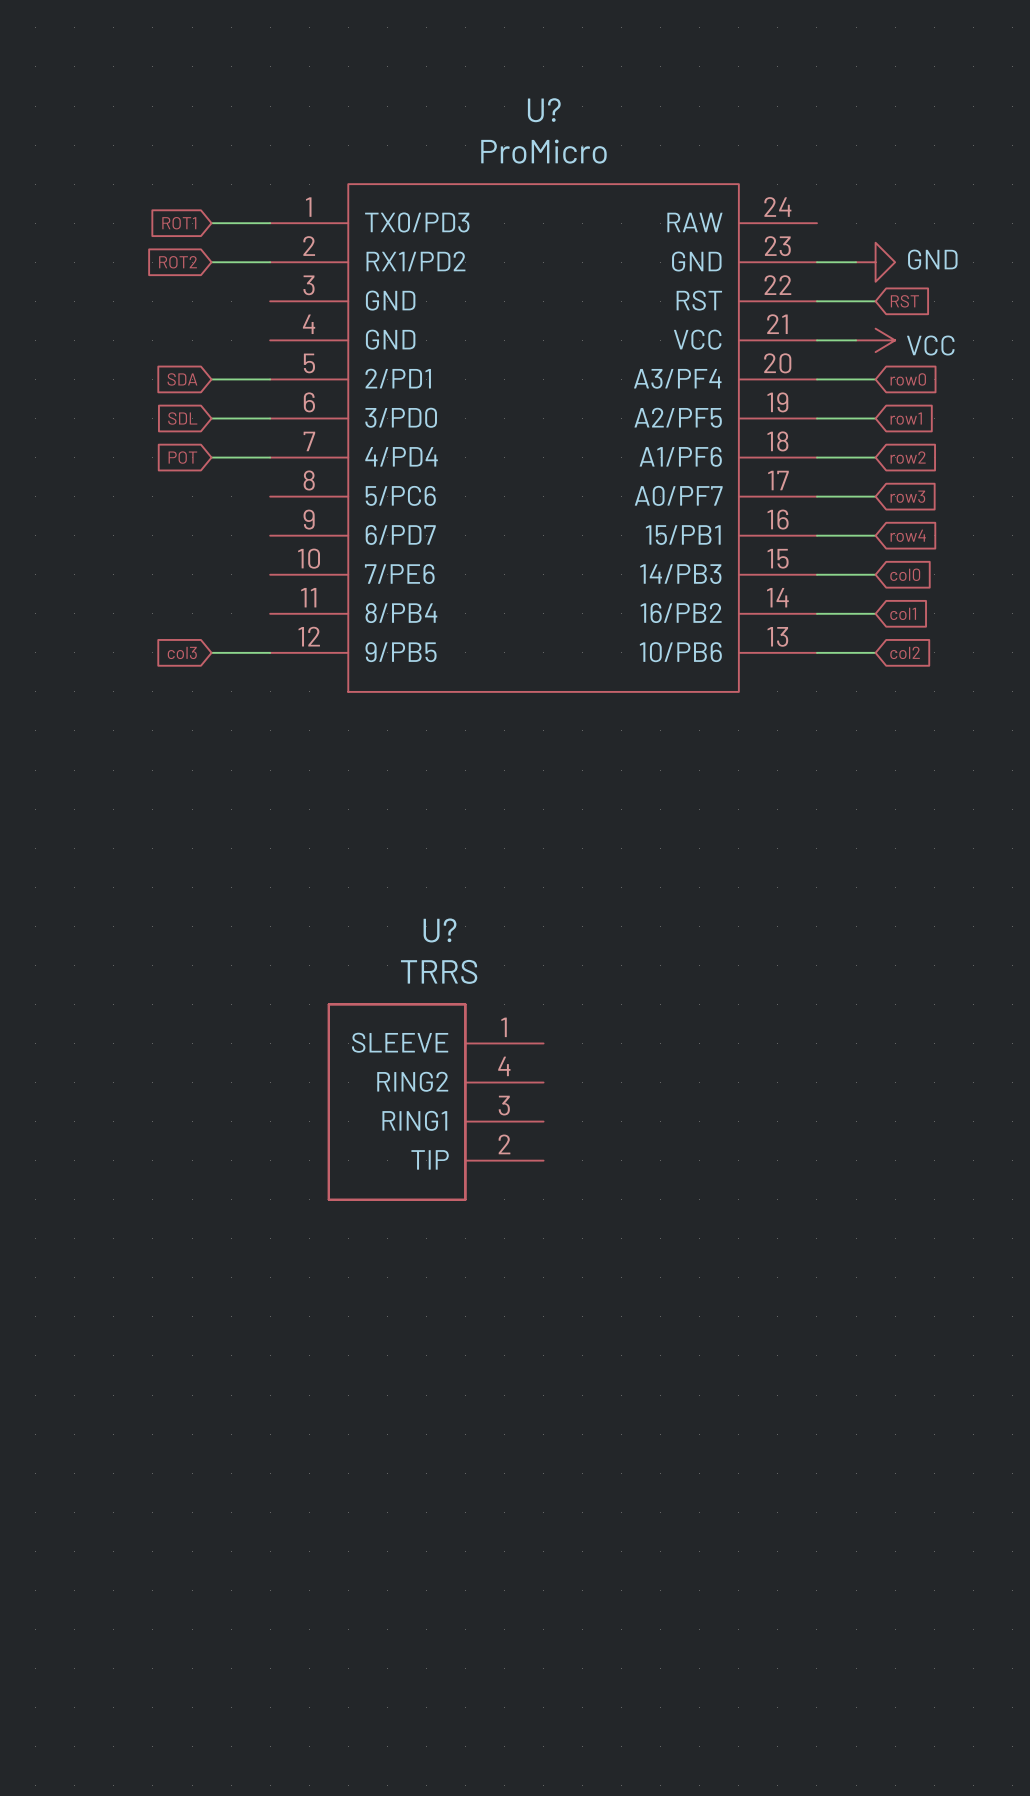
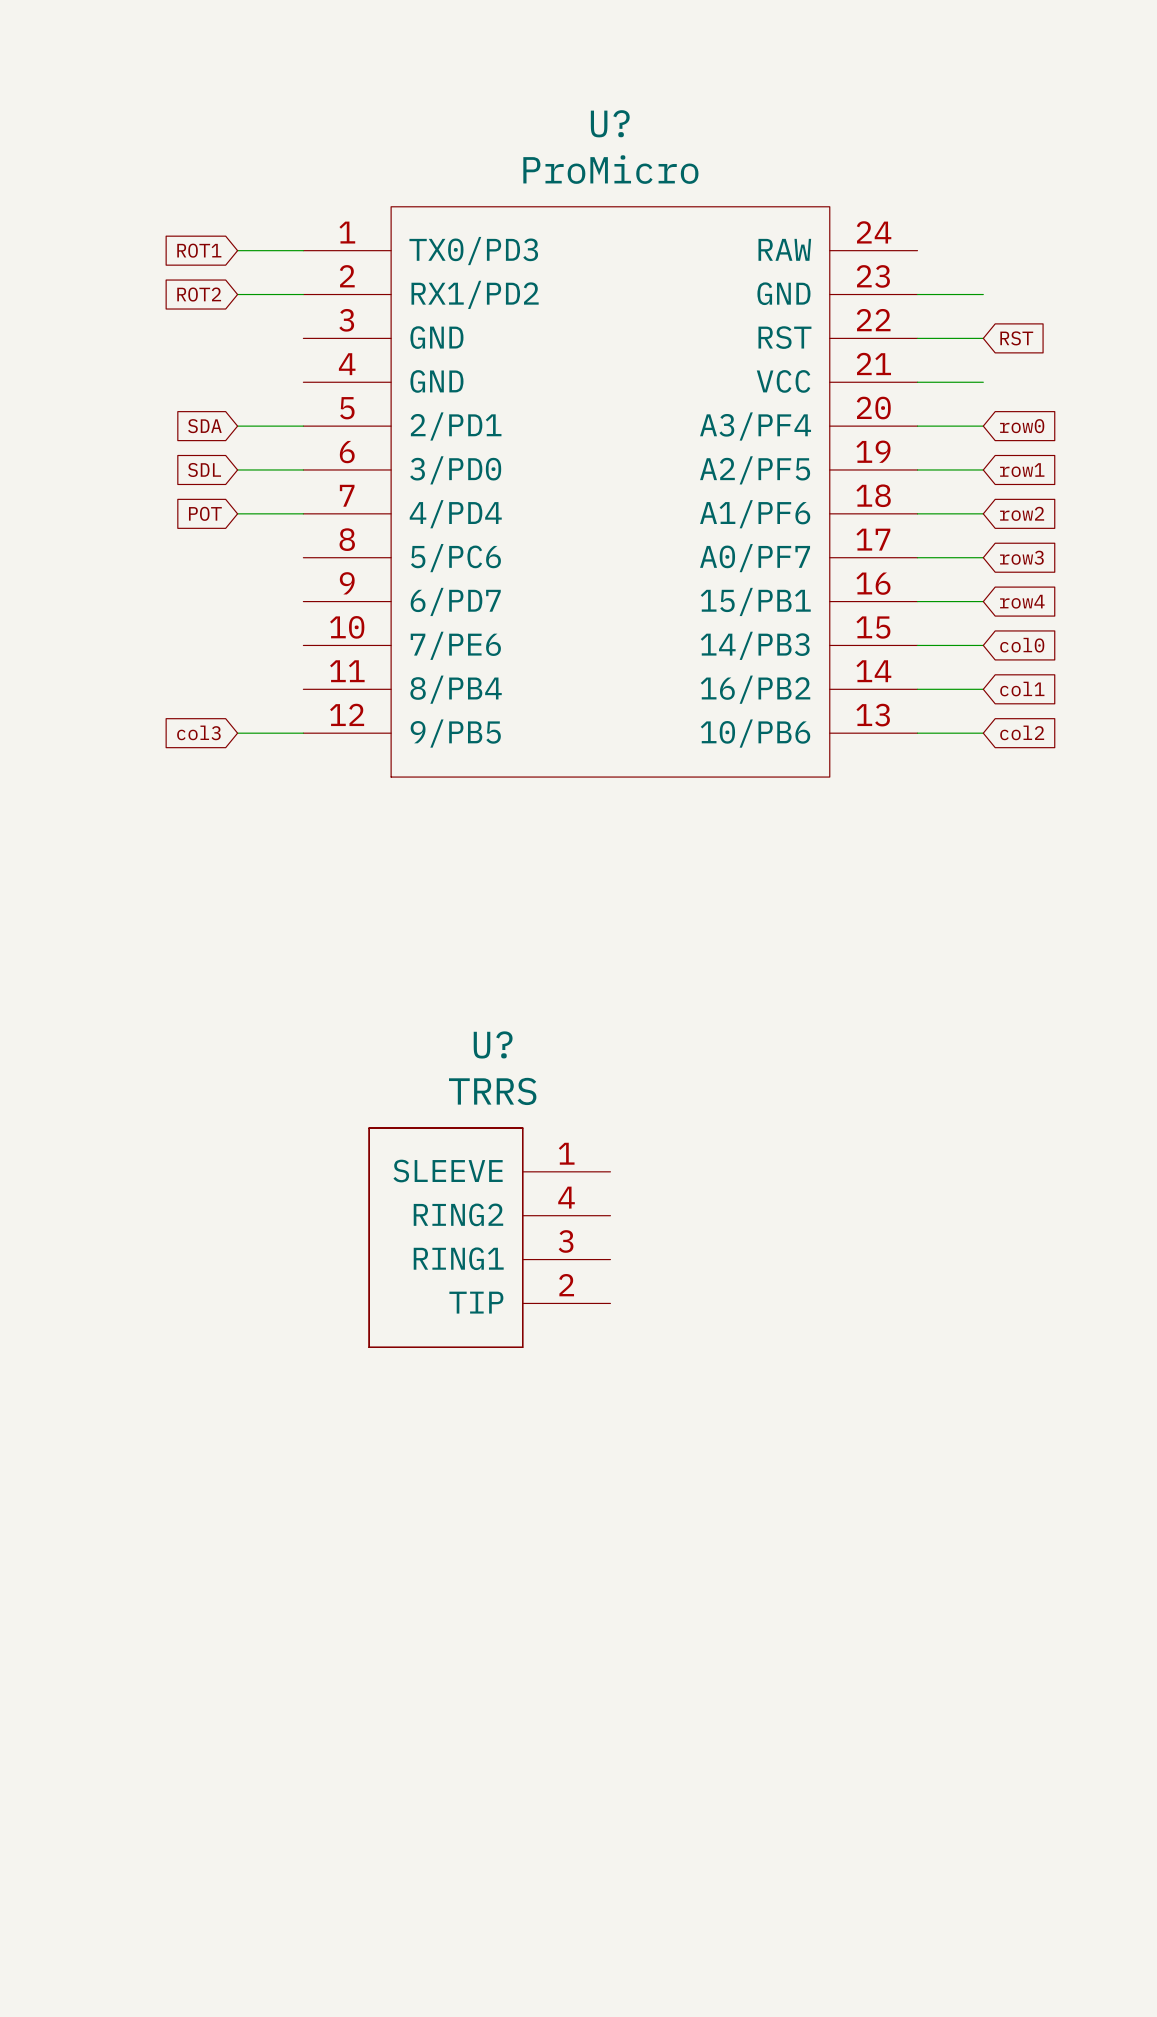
power symbol: GND (875, 262) -> none
power symbol: VCC (875, 340) -> none

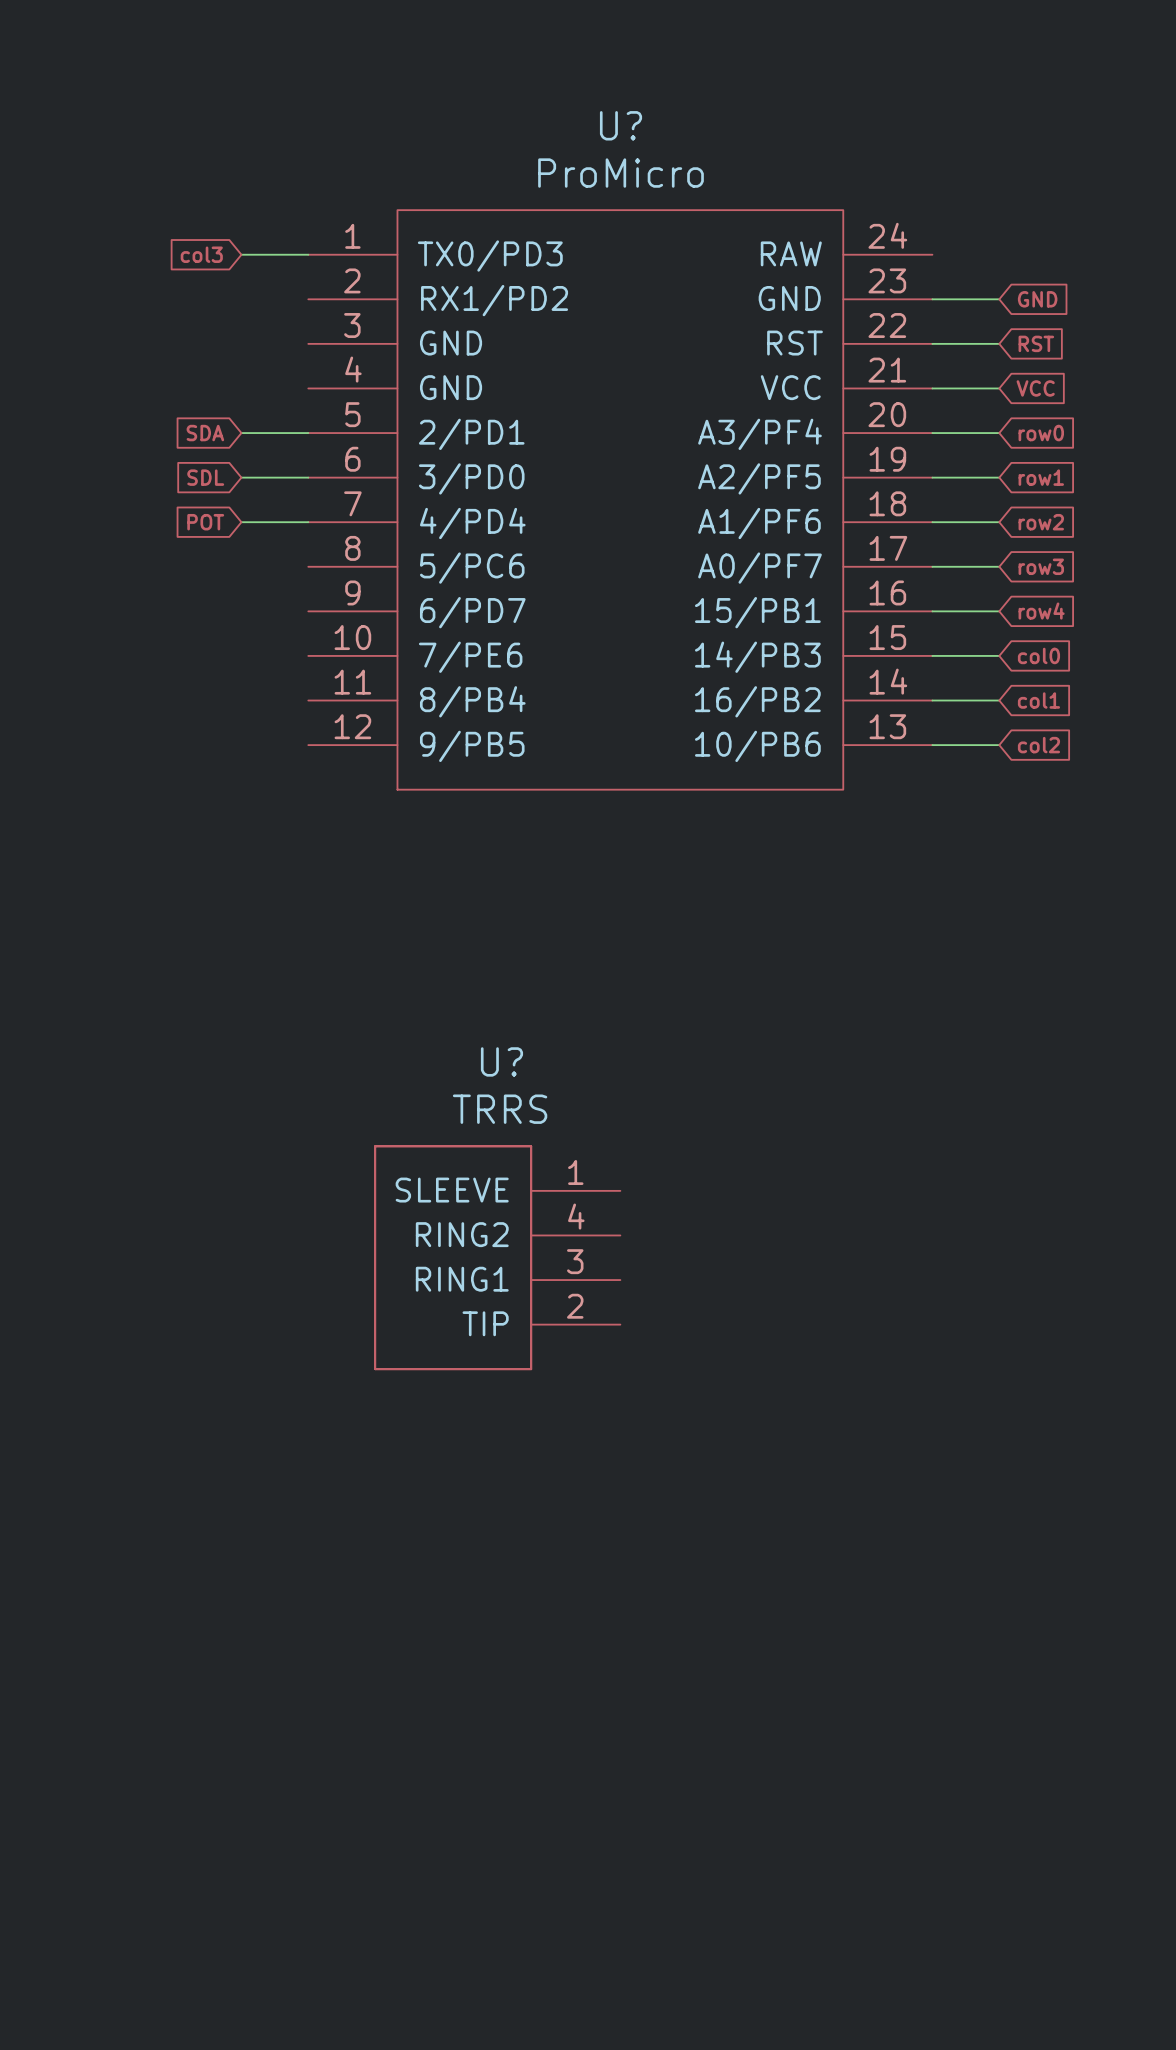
global label: ROT1 (199, 250) -> col3 (201, 254)
global label: ROT2 (199, 294) -> none
wire: (237, 294) (303, 294) -> none
global label: none -> GND (1037, 299)
global label: none -> VCC (1035, 388)
global label: col3 (198, 732) -> none
wire: (237, 733) (303, 733) -> none

